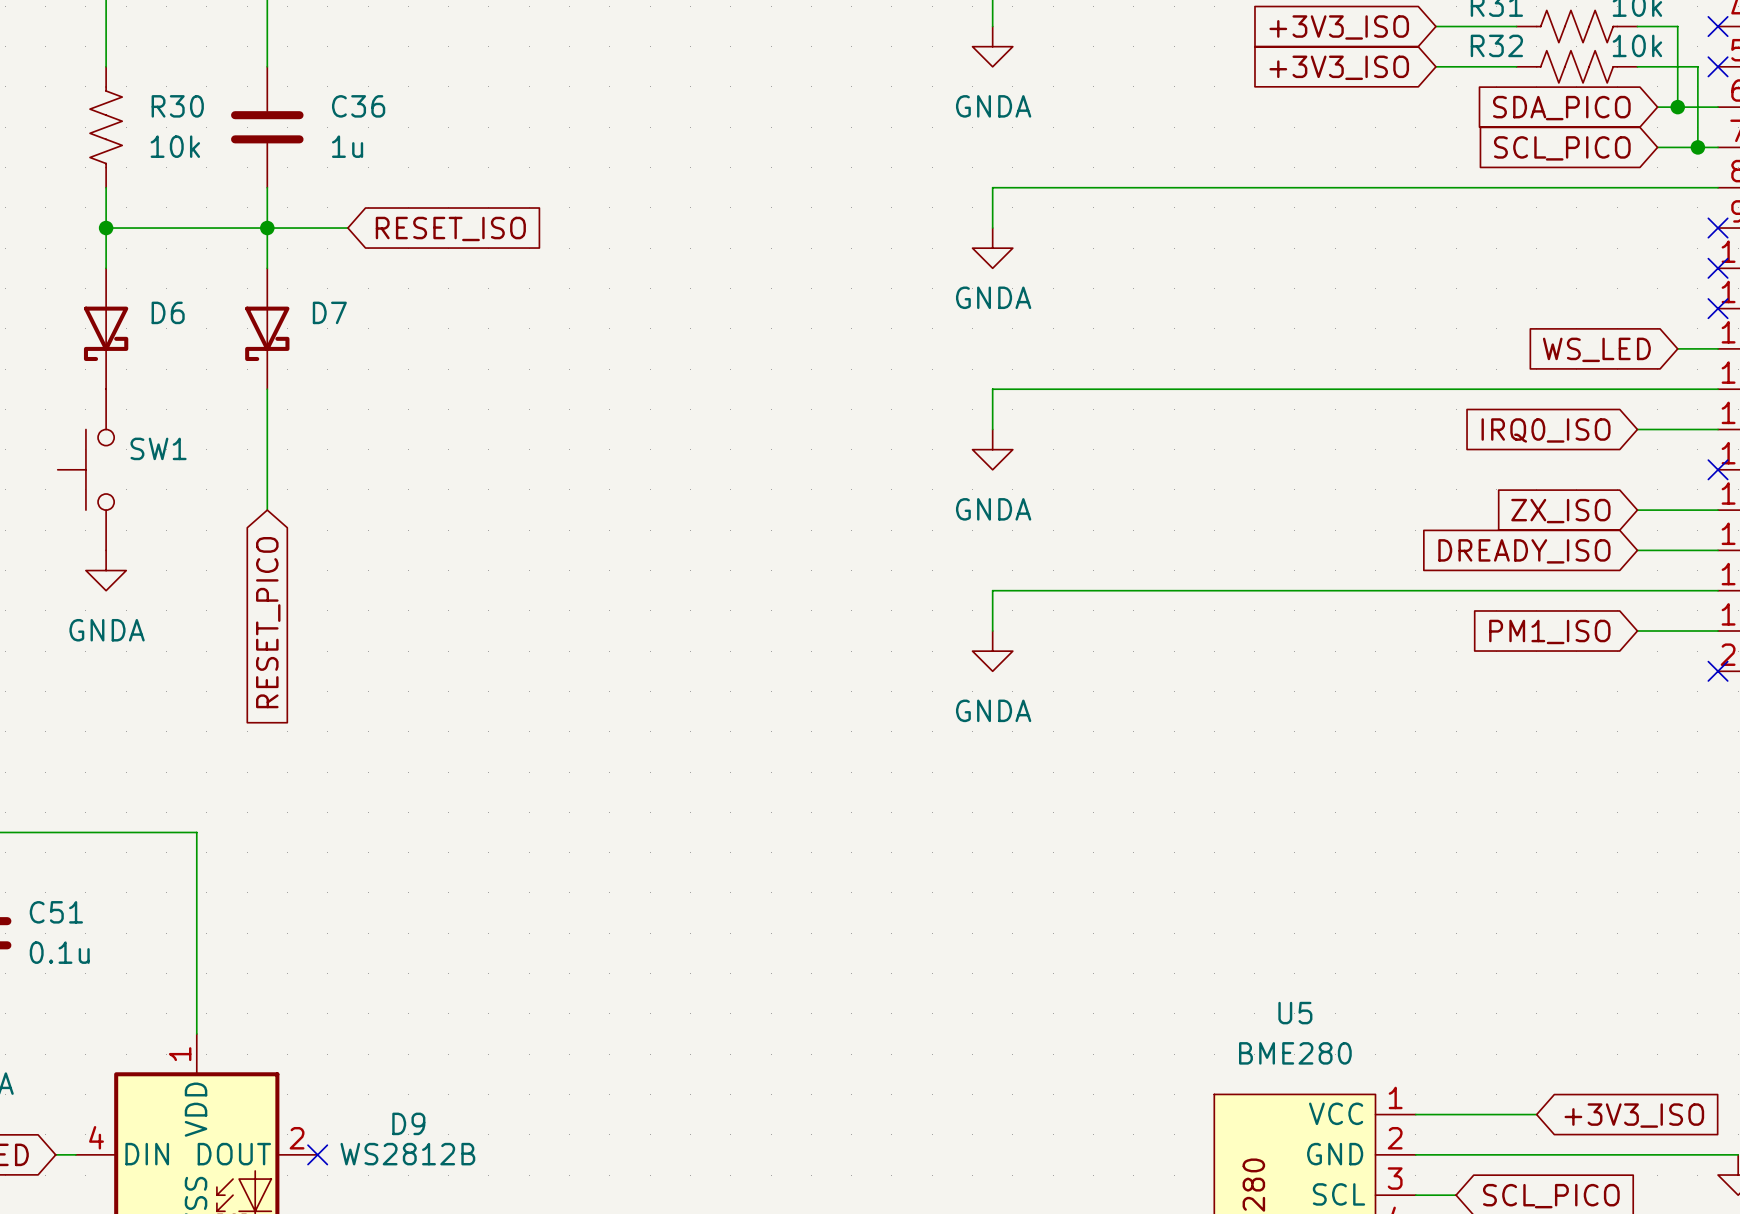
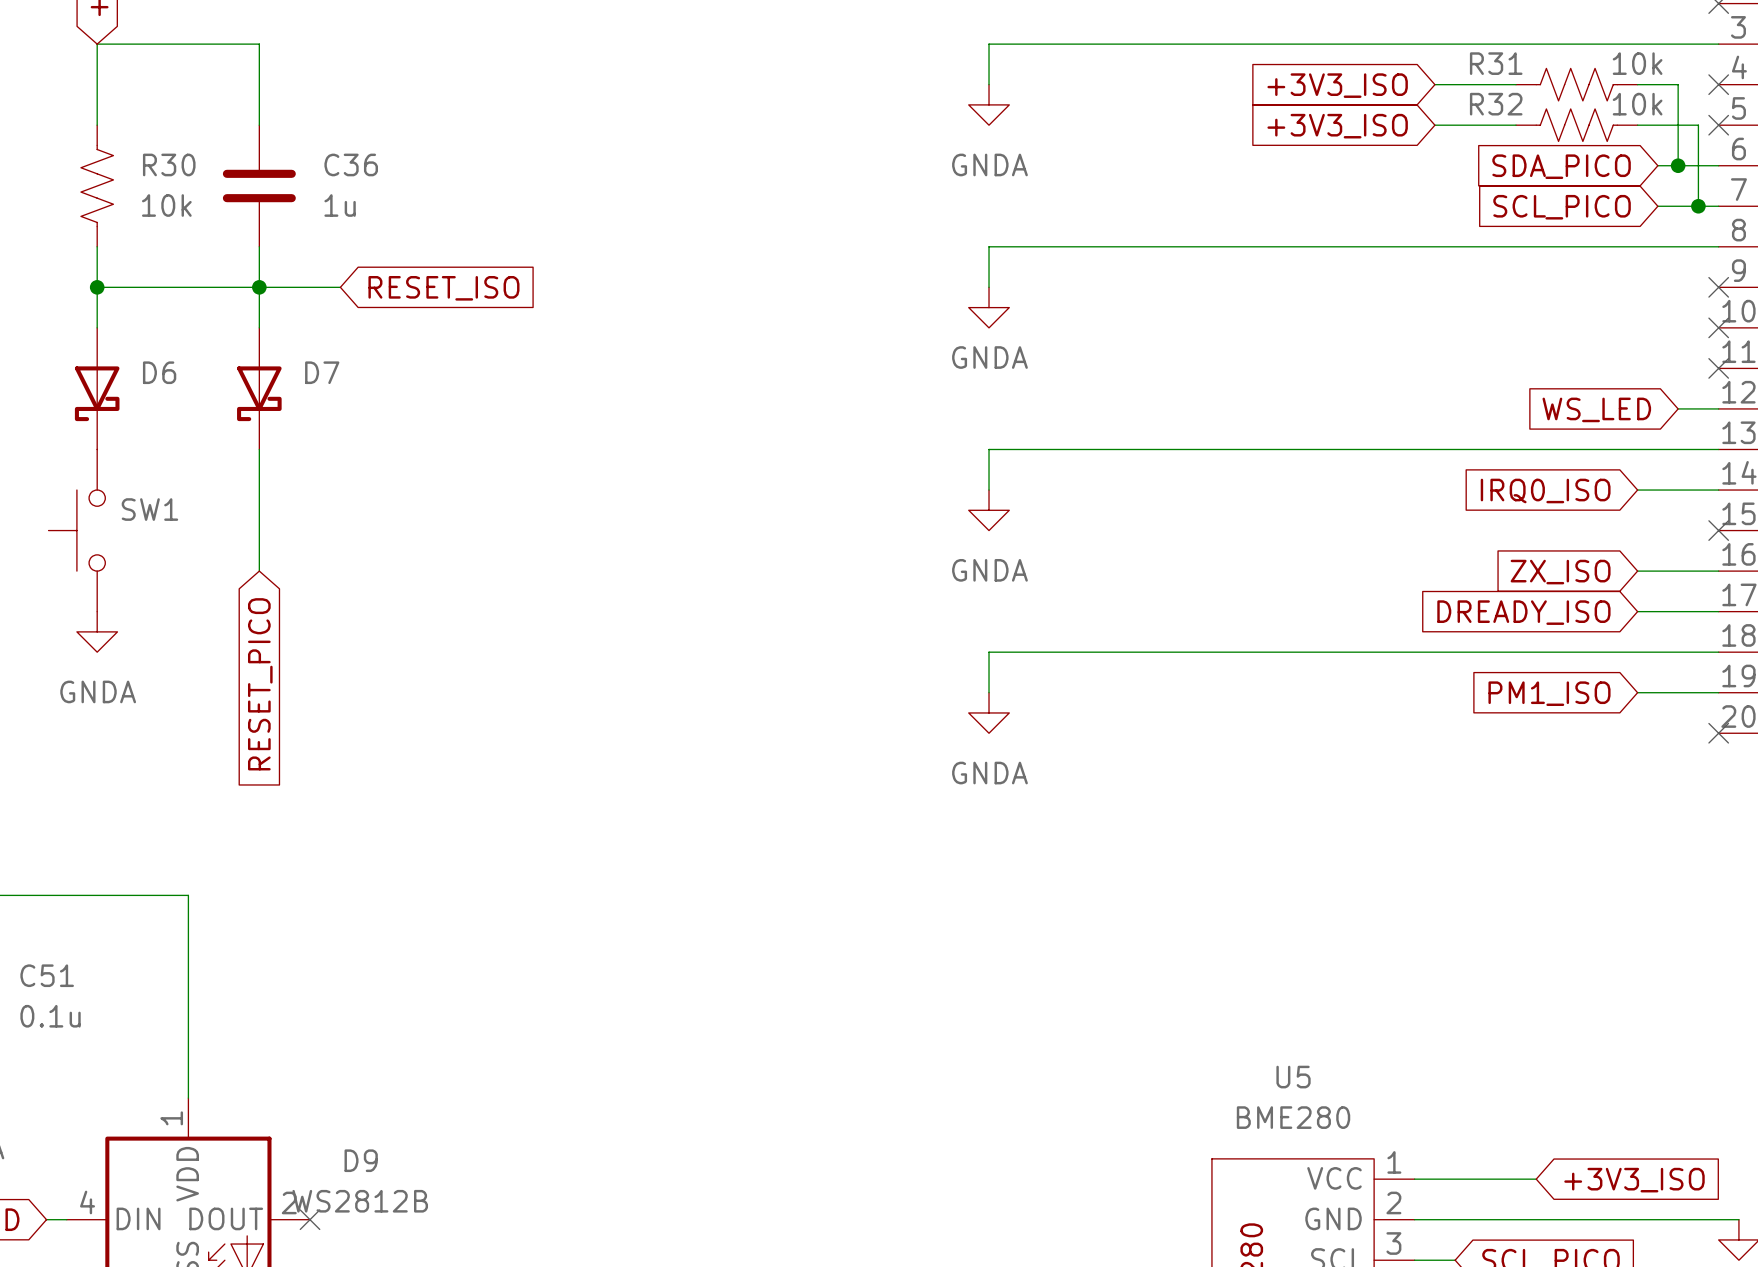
D9 name position: D9 (408, 1123) -> D9 (361, 1160)
D9 value position: WS2812B (407, 1154) -> WS2812B (360, 1201)

